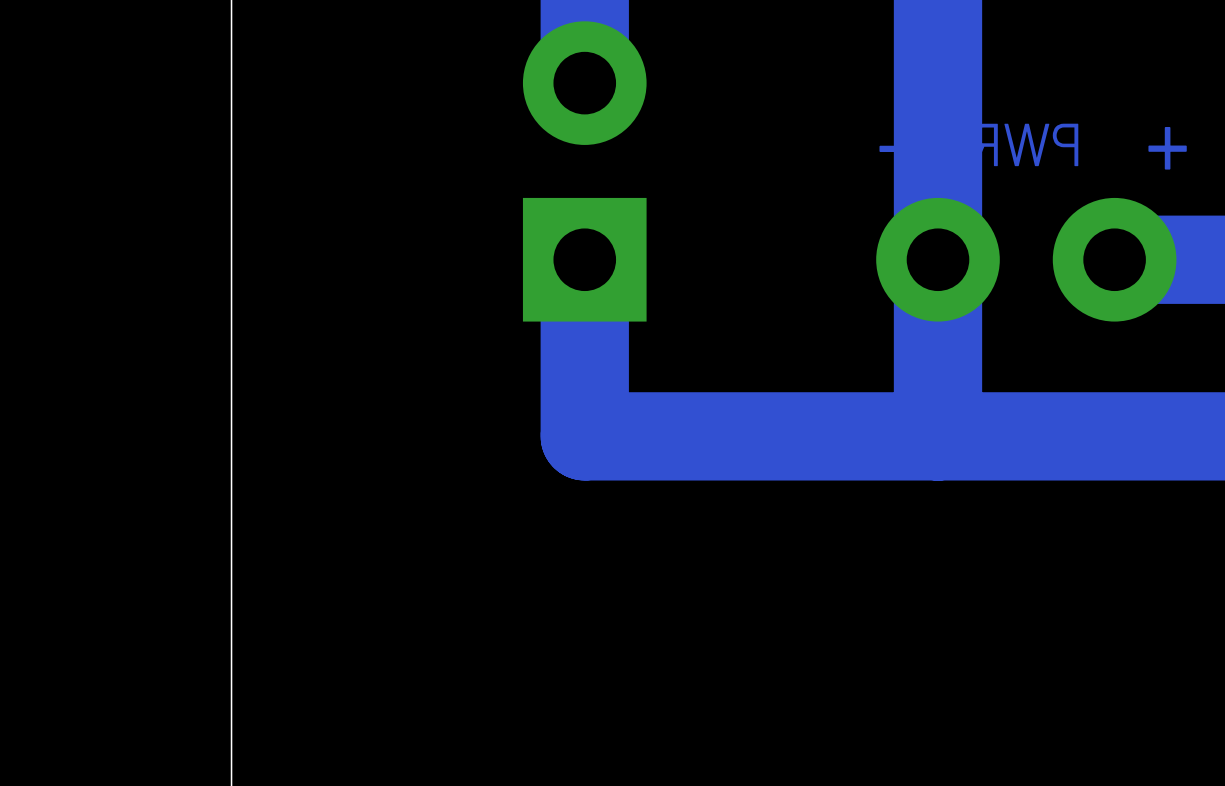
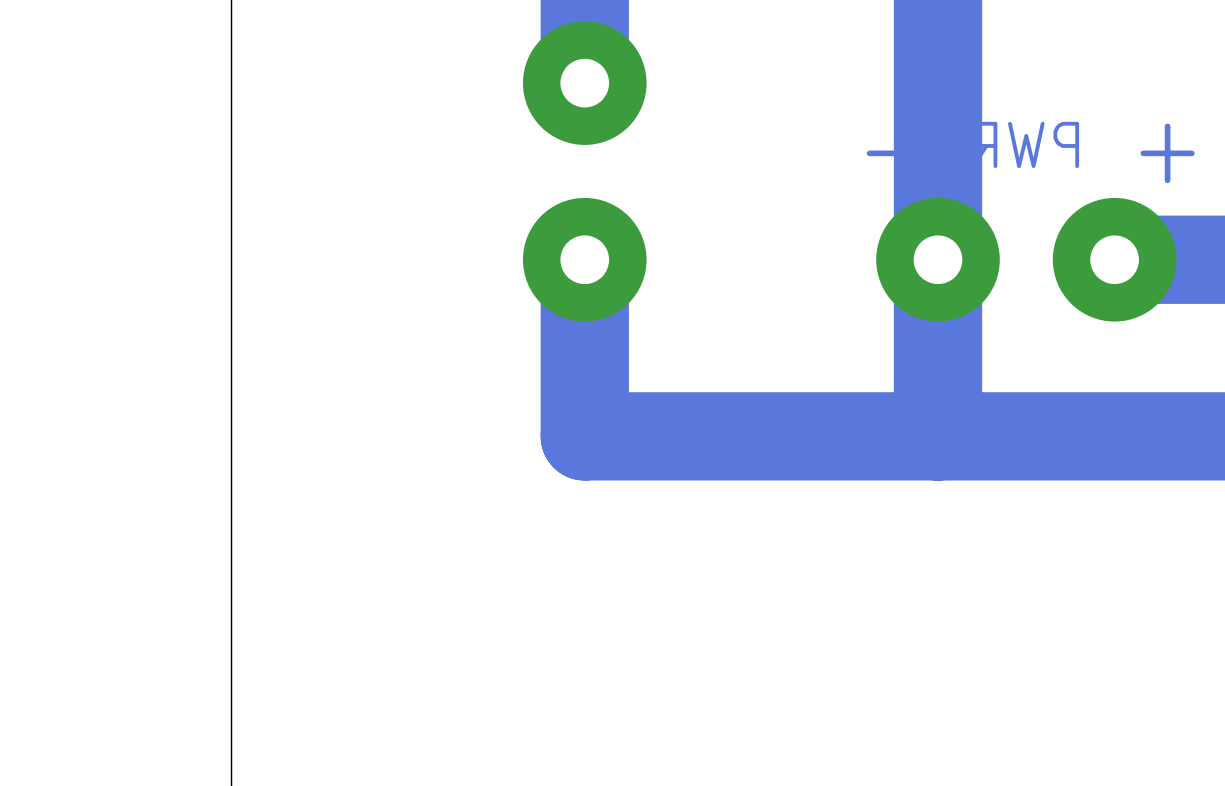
part footprint: [522, 21, 647, 322] -> [522, 21, 647, 322]
part footprint: [876, 197, 1177, 322] -> [876, 197, 1177, 322]

